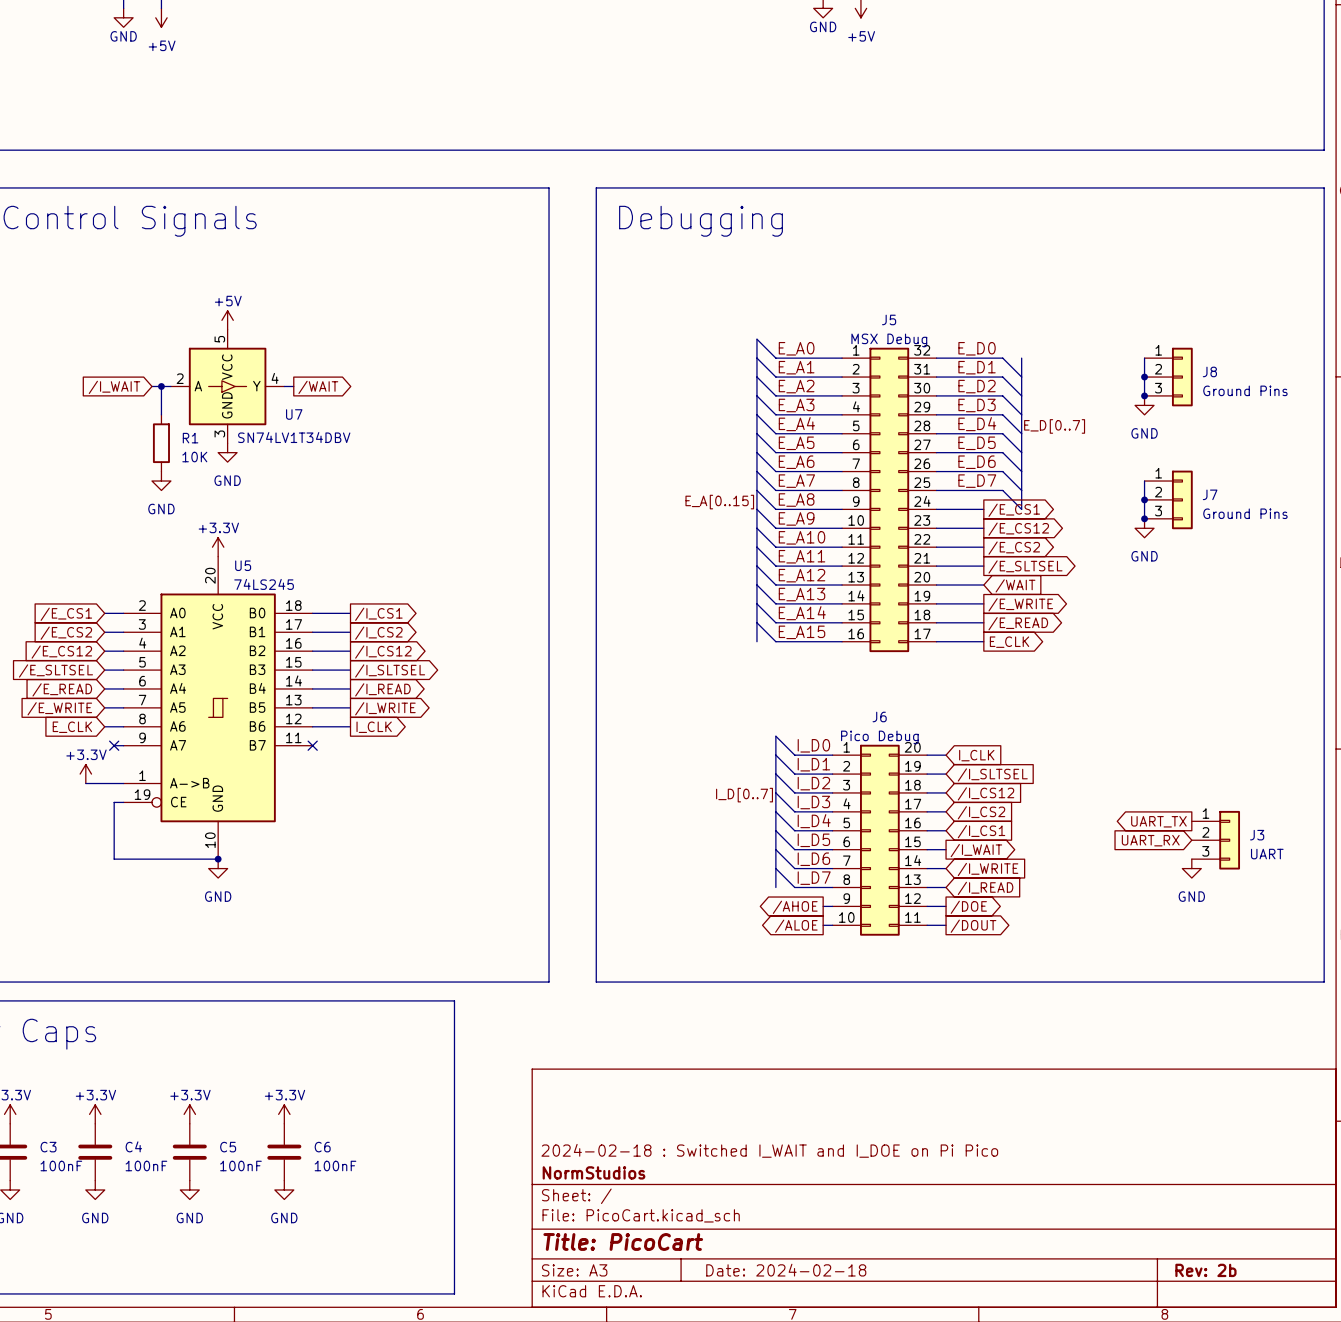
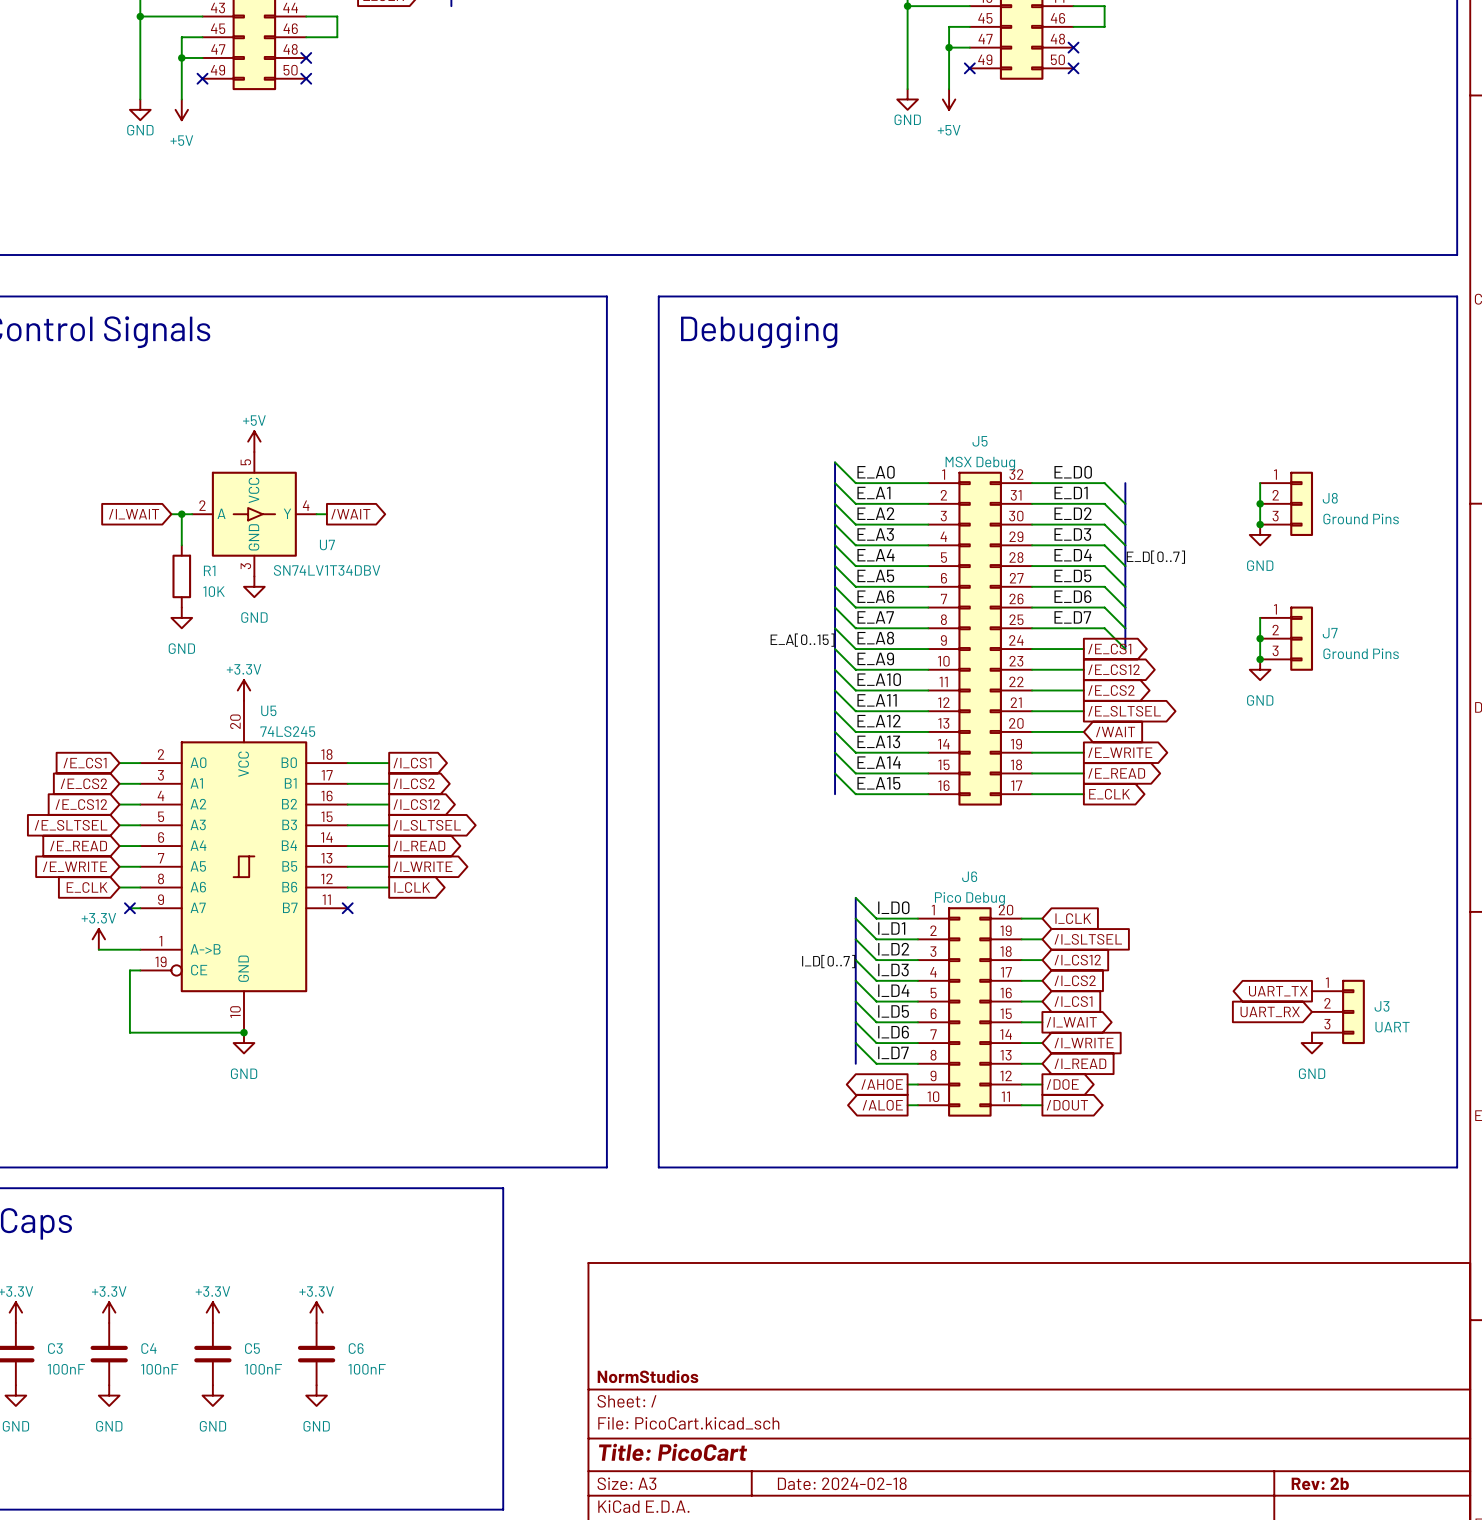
title block: 2024-02-18 : Switched I_WAIT and I_DOE on Pi Pico (769, 1150) -> none

